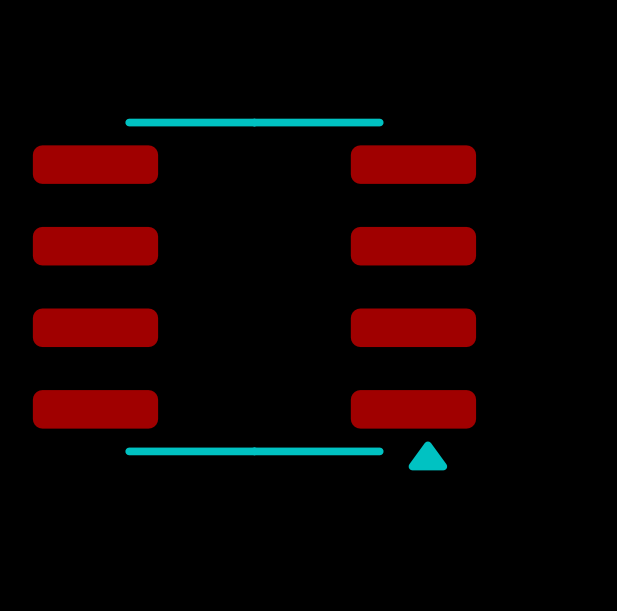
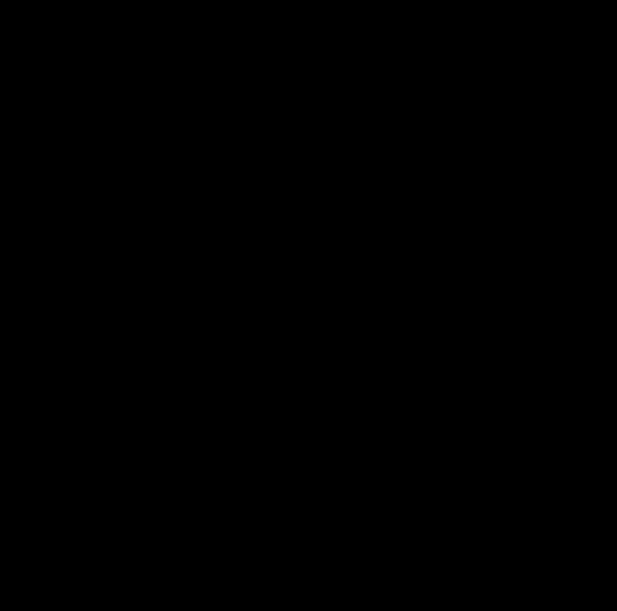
part: (254, 294) -> none

